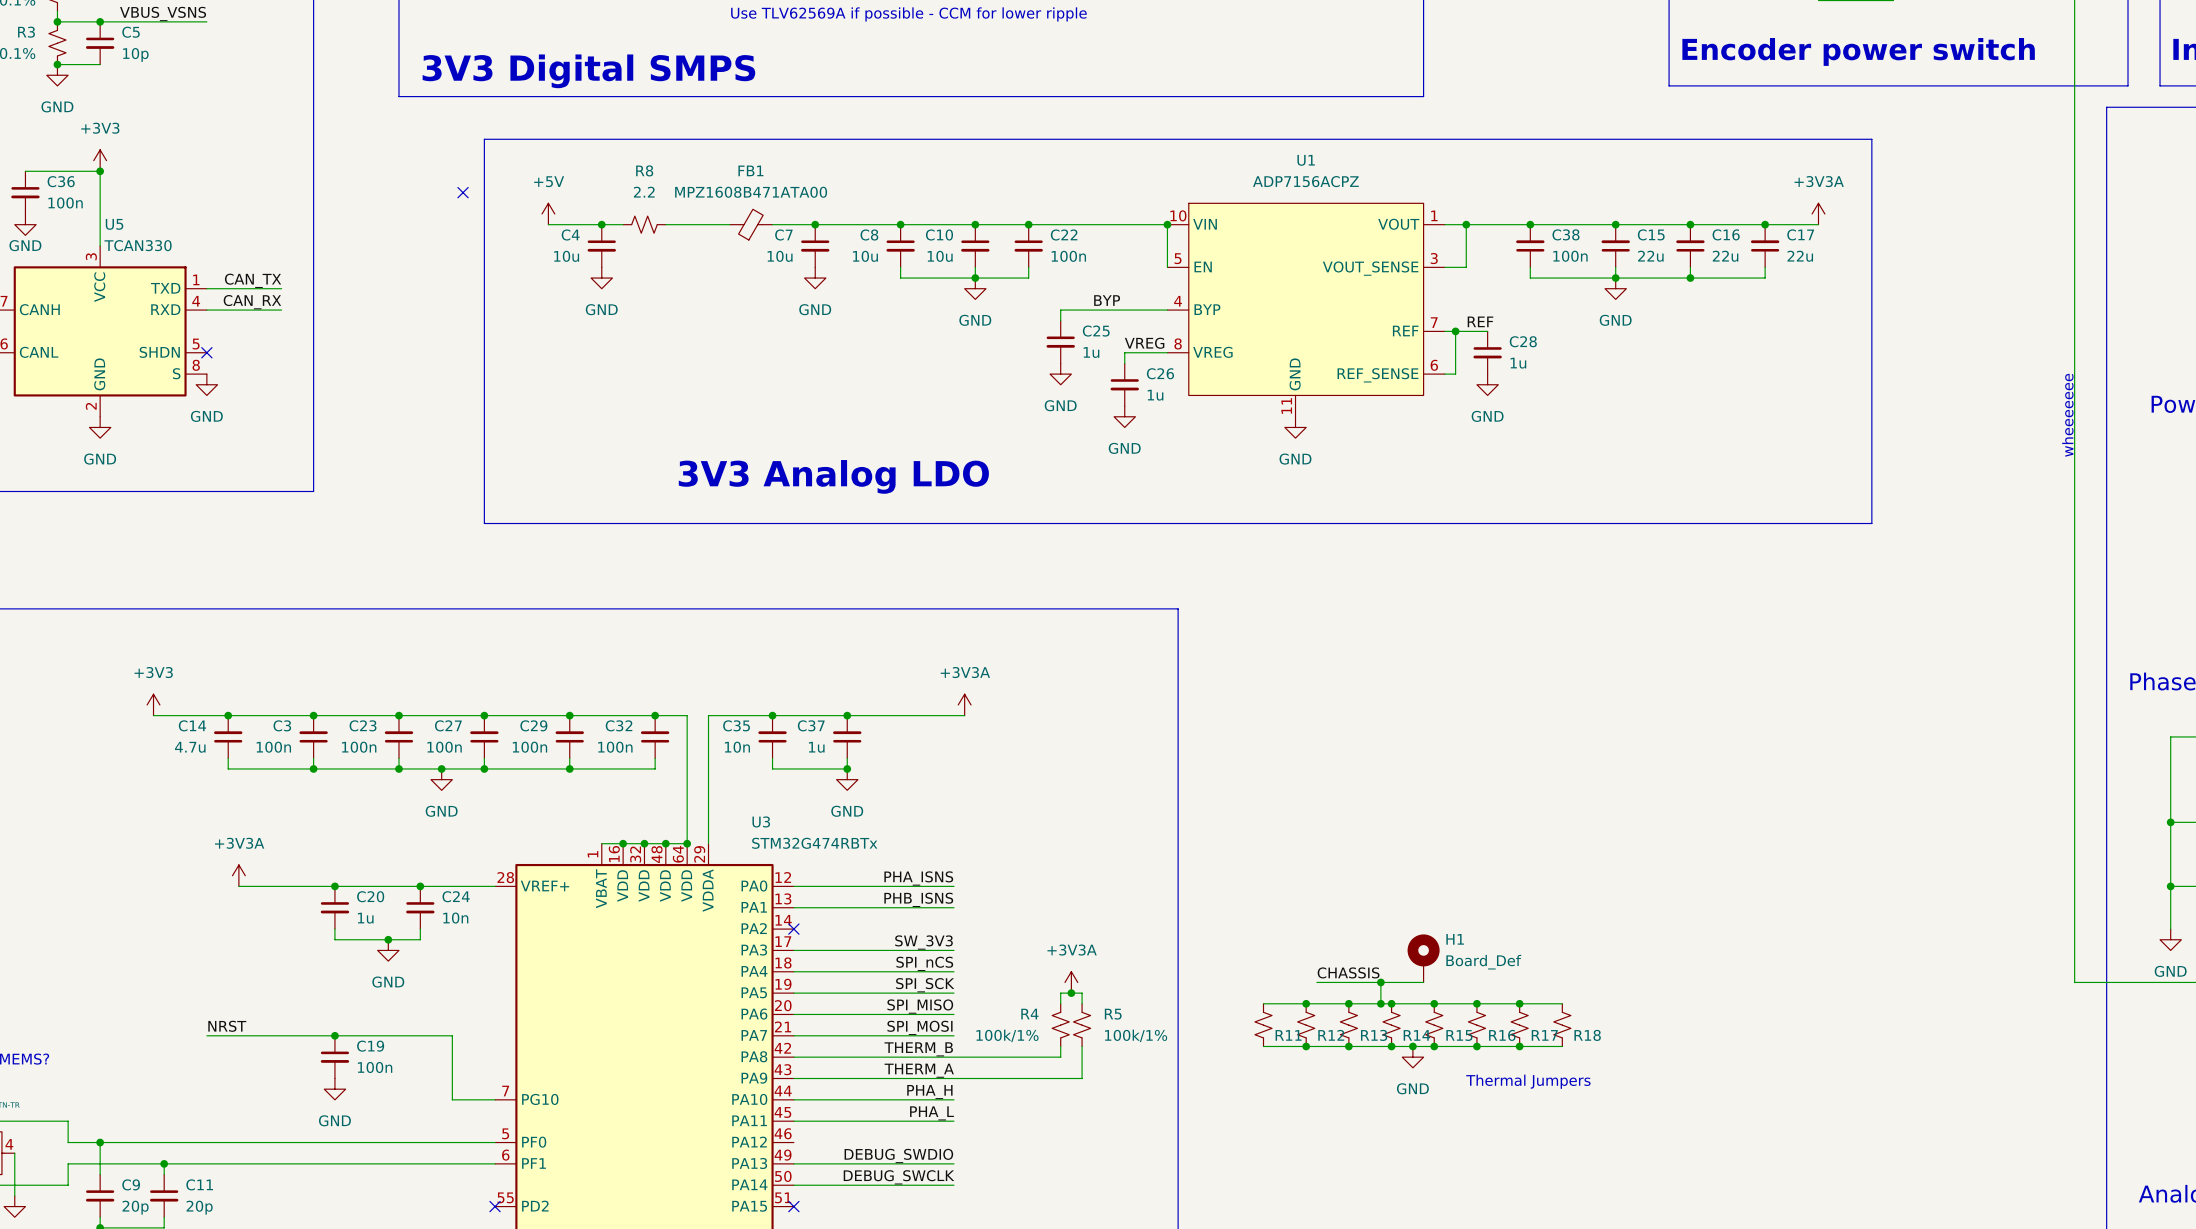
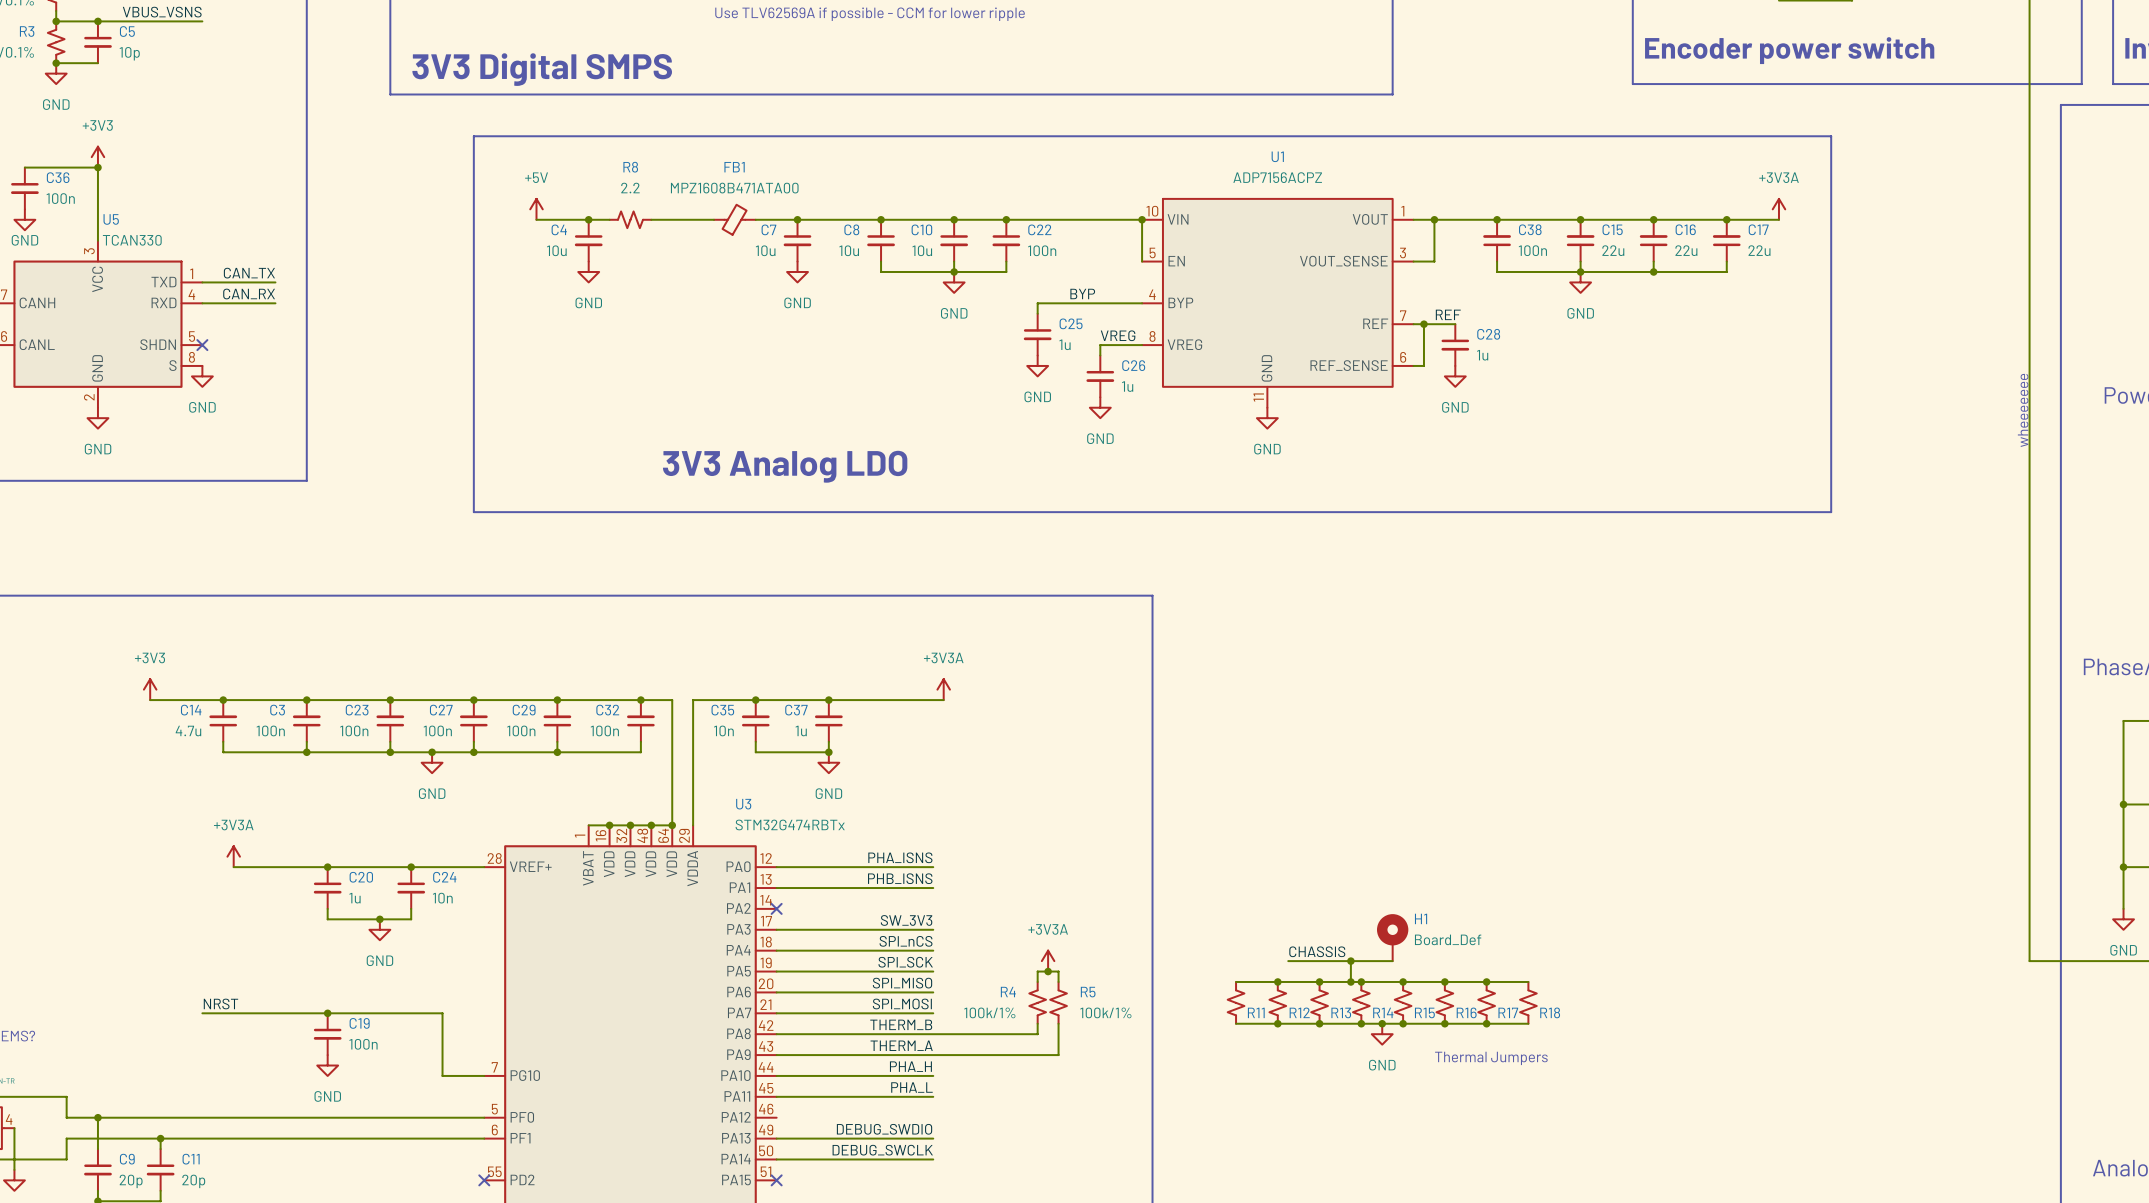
no-connect mark: (463, 192) -> none

